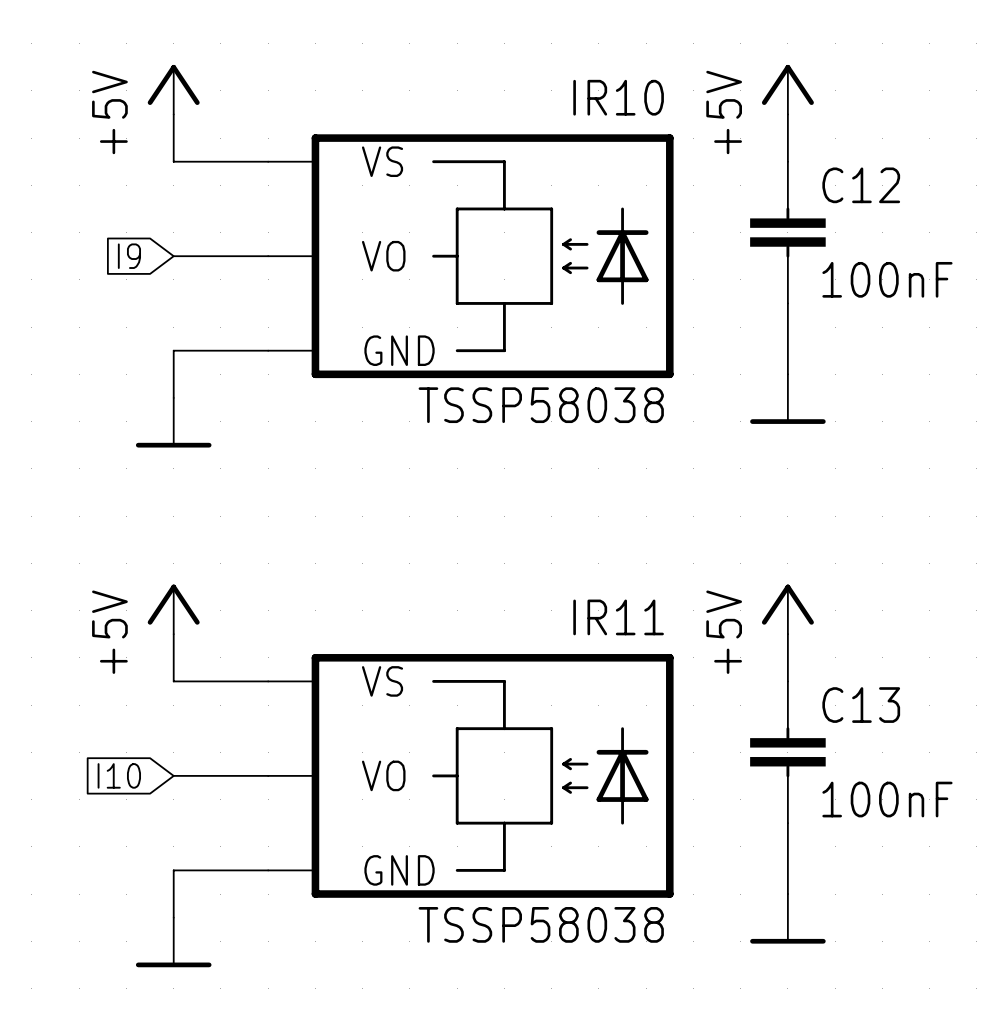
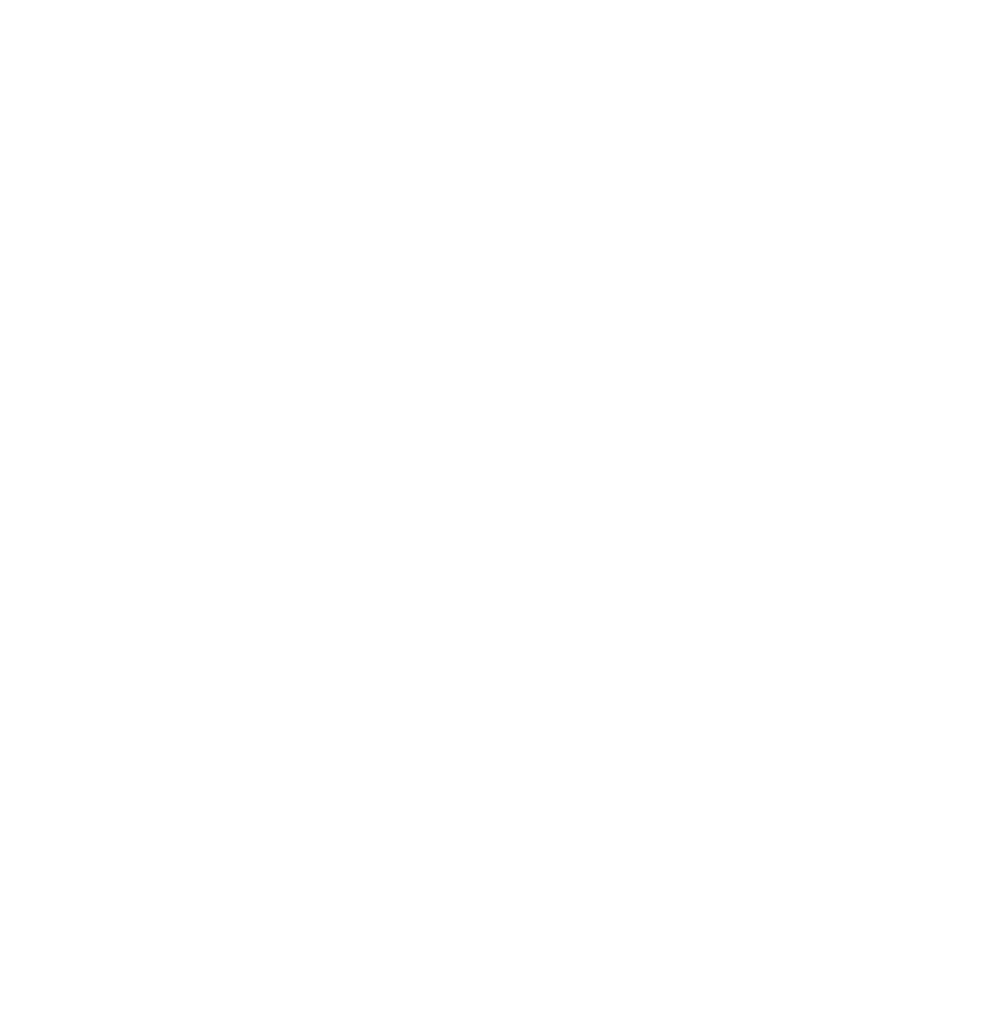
power symbol: +5V (173, 89) -> none
power symbol: +5V (787, 89) -> none
wire: (173, 114) (173, 161) (268, 161) -> none
wire: (787, 114) (787, 161) -> none
C12: 100nF (787, 232) -> none
global label: I9 (129, 256) -> none
wire: (173, 256) (268, 256) -> none
IR10: TSSP58038 (470, 256) -> none
wire: (787, 303) (787, 374) -> none
wire: (268, 350) (173, 350) (173, 397) -> none
power symbol: (787, 399) -> none
power symbol: (173, 422) -> none
power symbol: +5V (173, 609) -> none
power symbol: +5V (787, 609) -> none
wire: (173, 634) (173, 681) (268, 681) -> none
wire: (787, 634) (787, 681) -> none
C13: 100nF (787, 752) -> none
global label: I10 (119, 775) -> none
wire: (173, 775) (268, 775) -> none
IR11: TSSP58038 (470, 775) -> none
wire: (787, 823) (787, 894) -> none
wire: (268, 870) (173, 870) (173, 917) -> none
power symbol: (787, 918) -> none
power symbol: (173, 942) -> none

